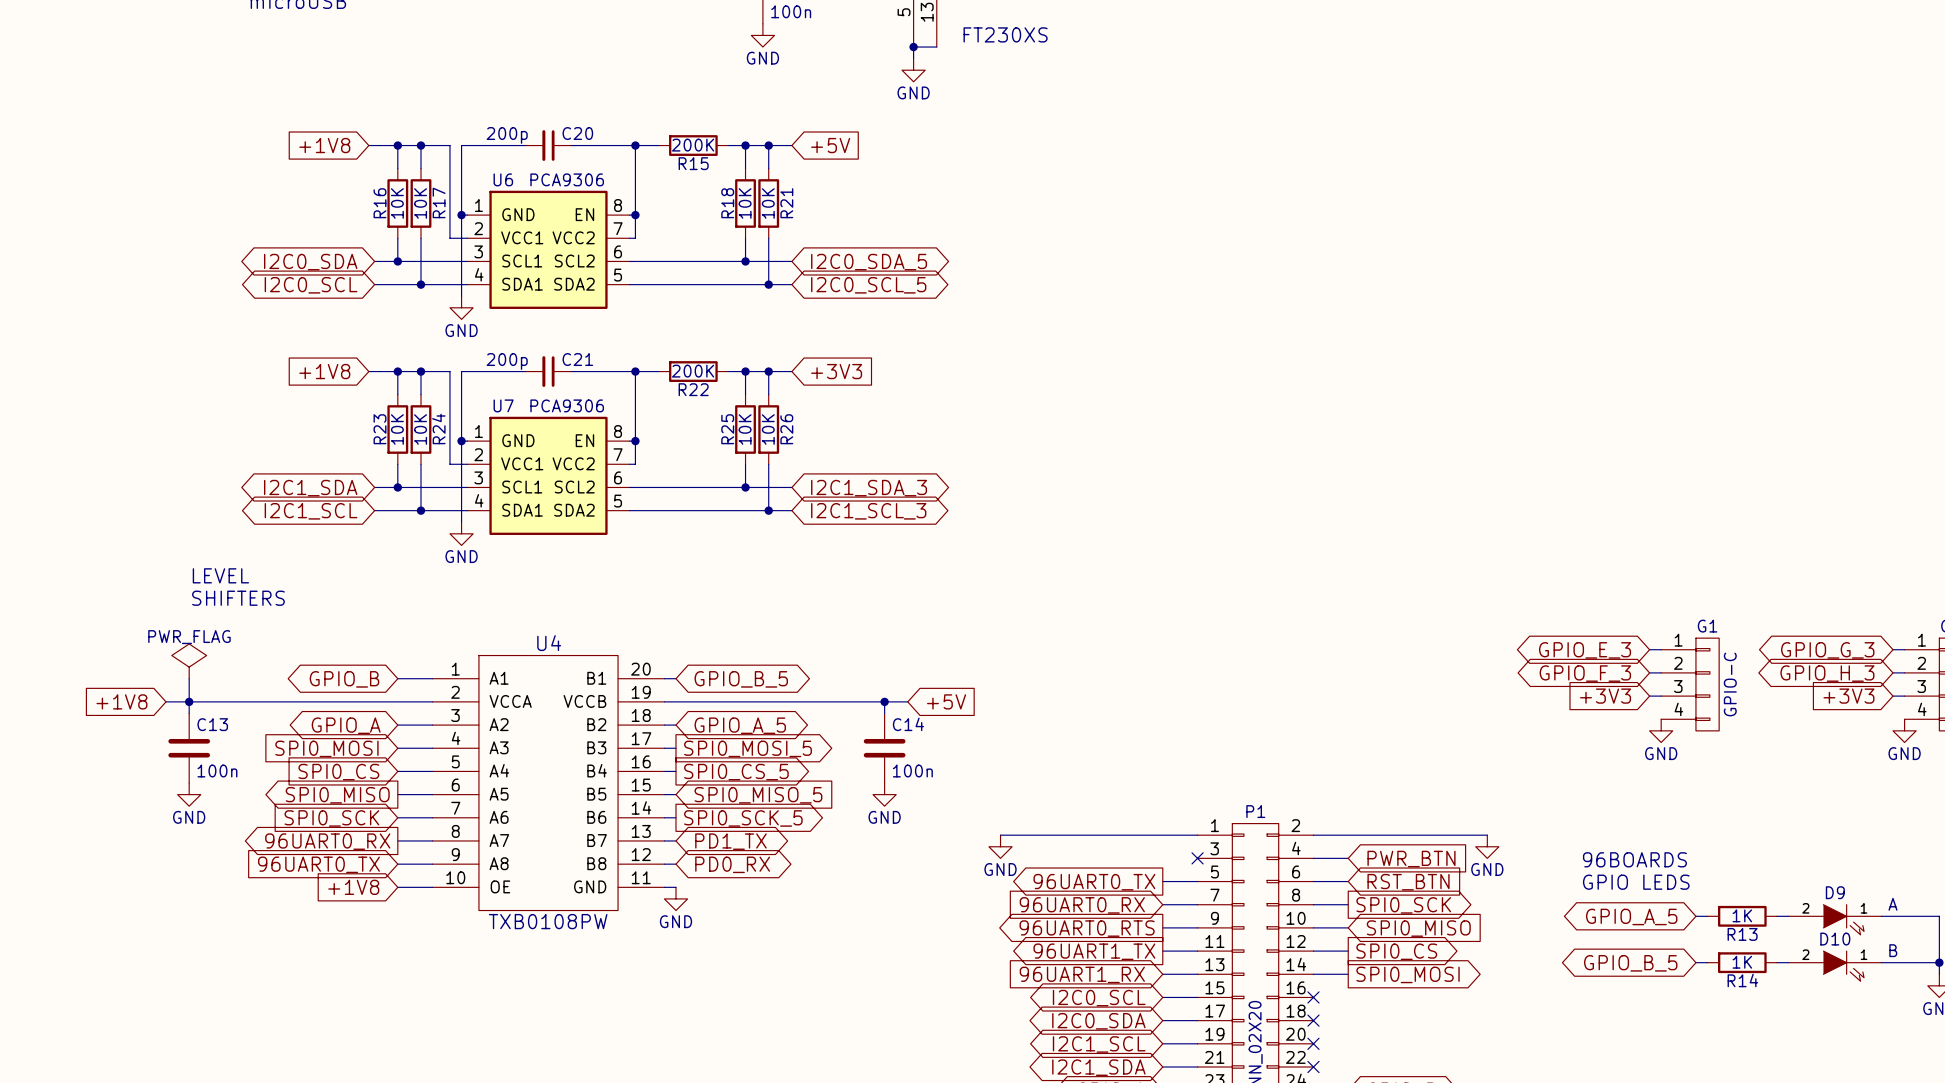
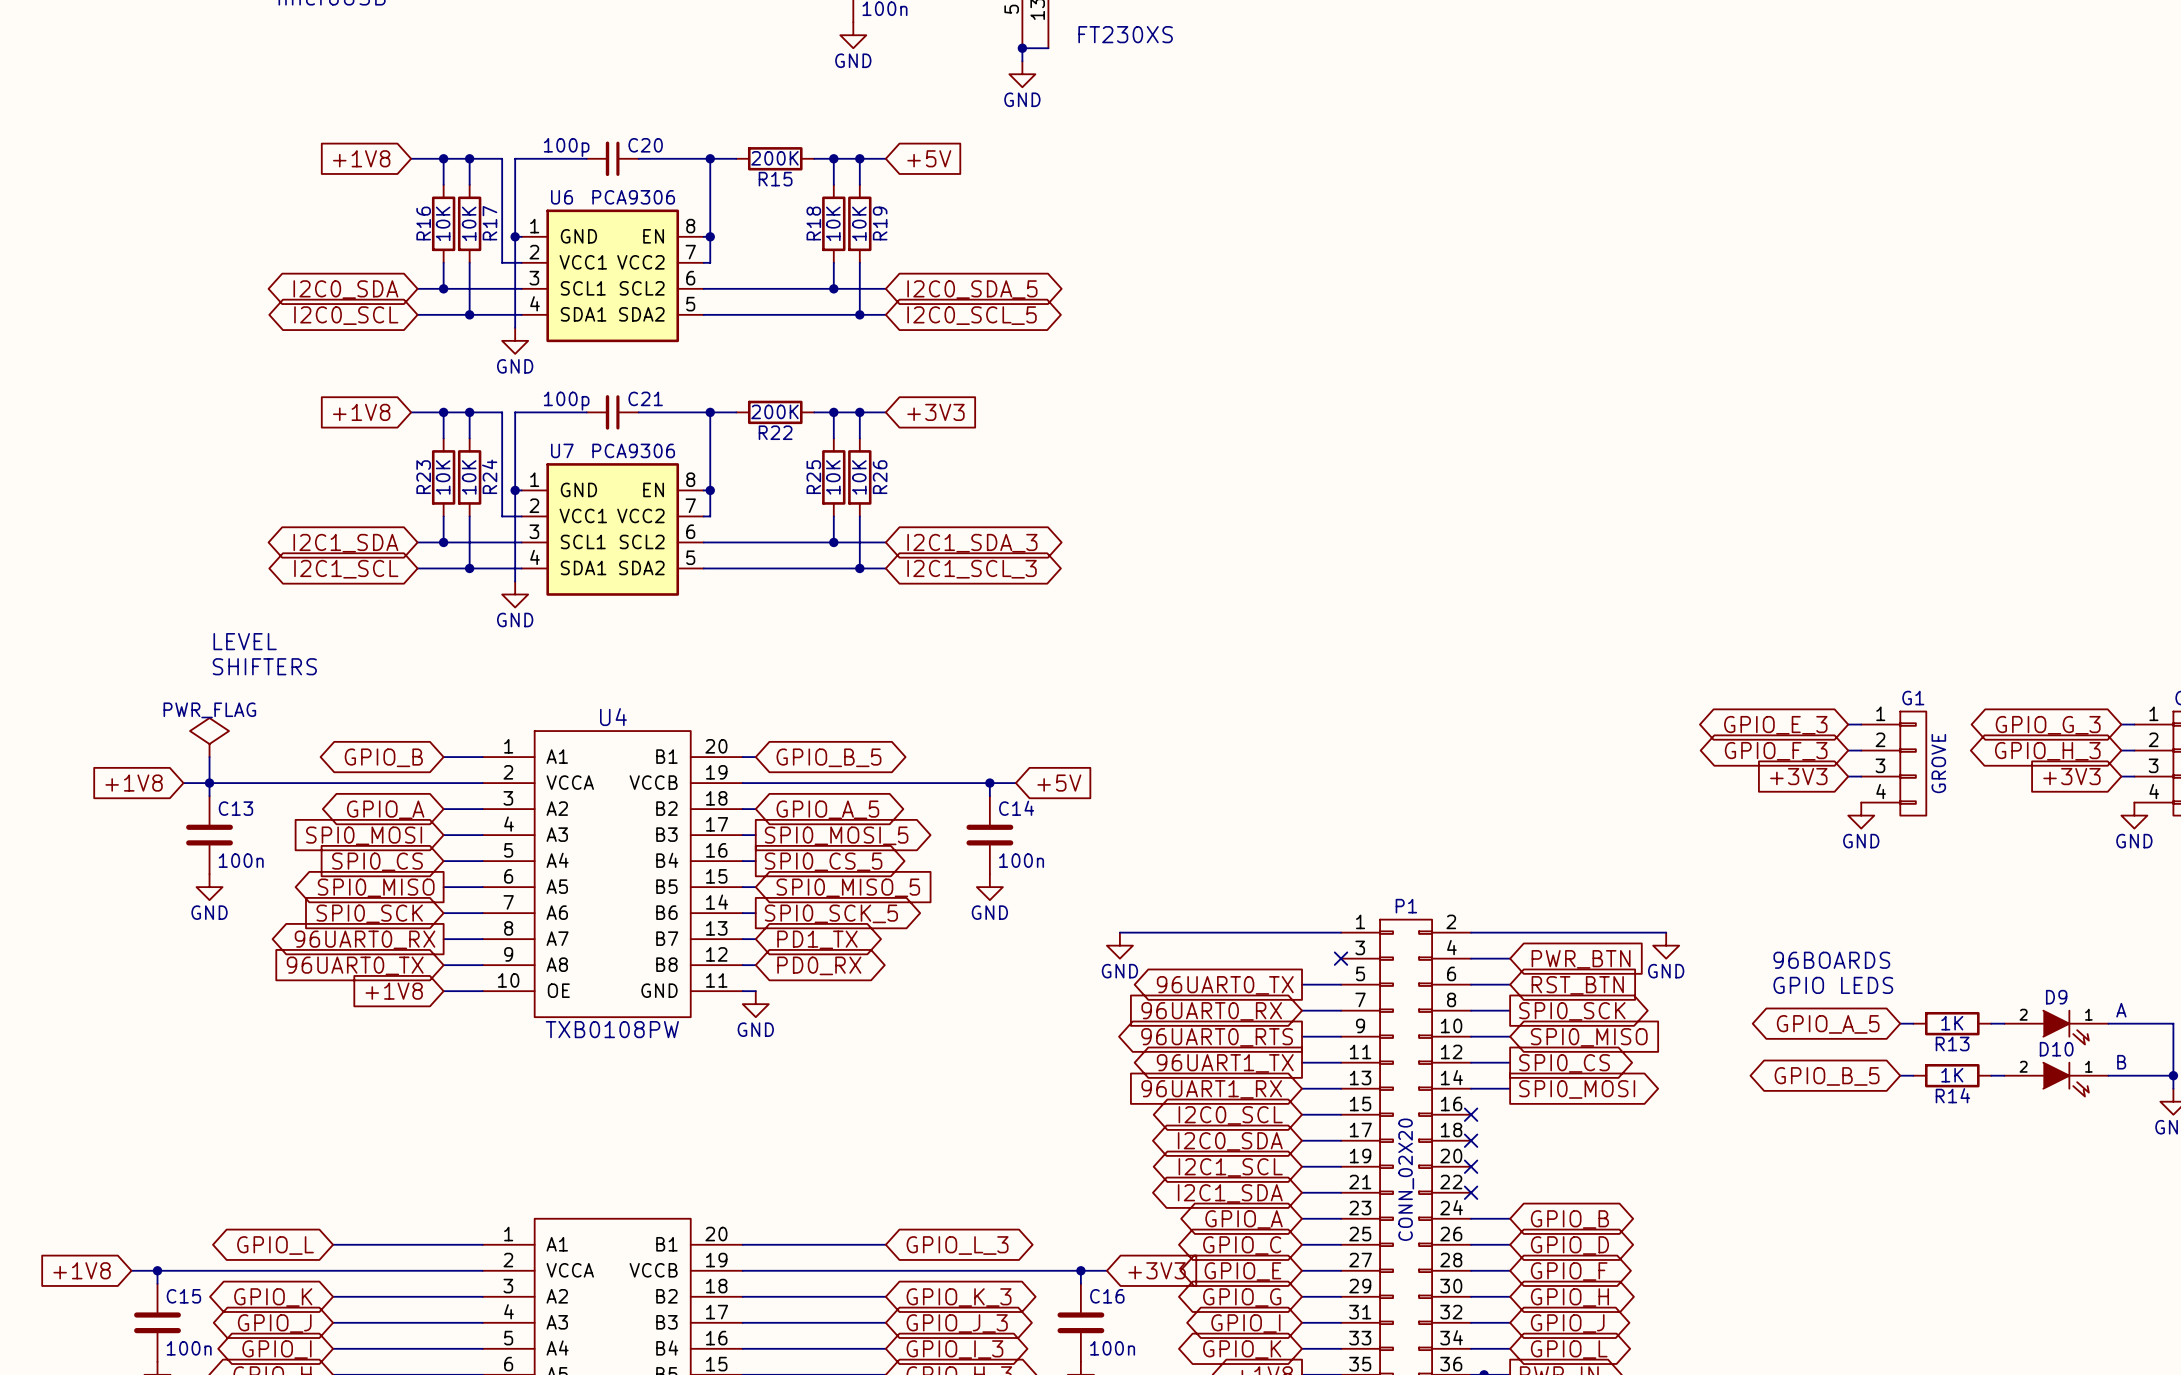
C20 value: 200p (507, 135) -> 100p (566, 147)
R21 name: R21 (786, 203) -> R19 (880, 223)
C21 value: 200p (507, 361) -> 100p (566, 401)
G1 value: GPIO-C (1730, 684) -> GROVE (1938, 763)

